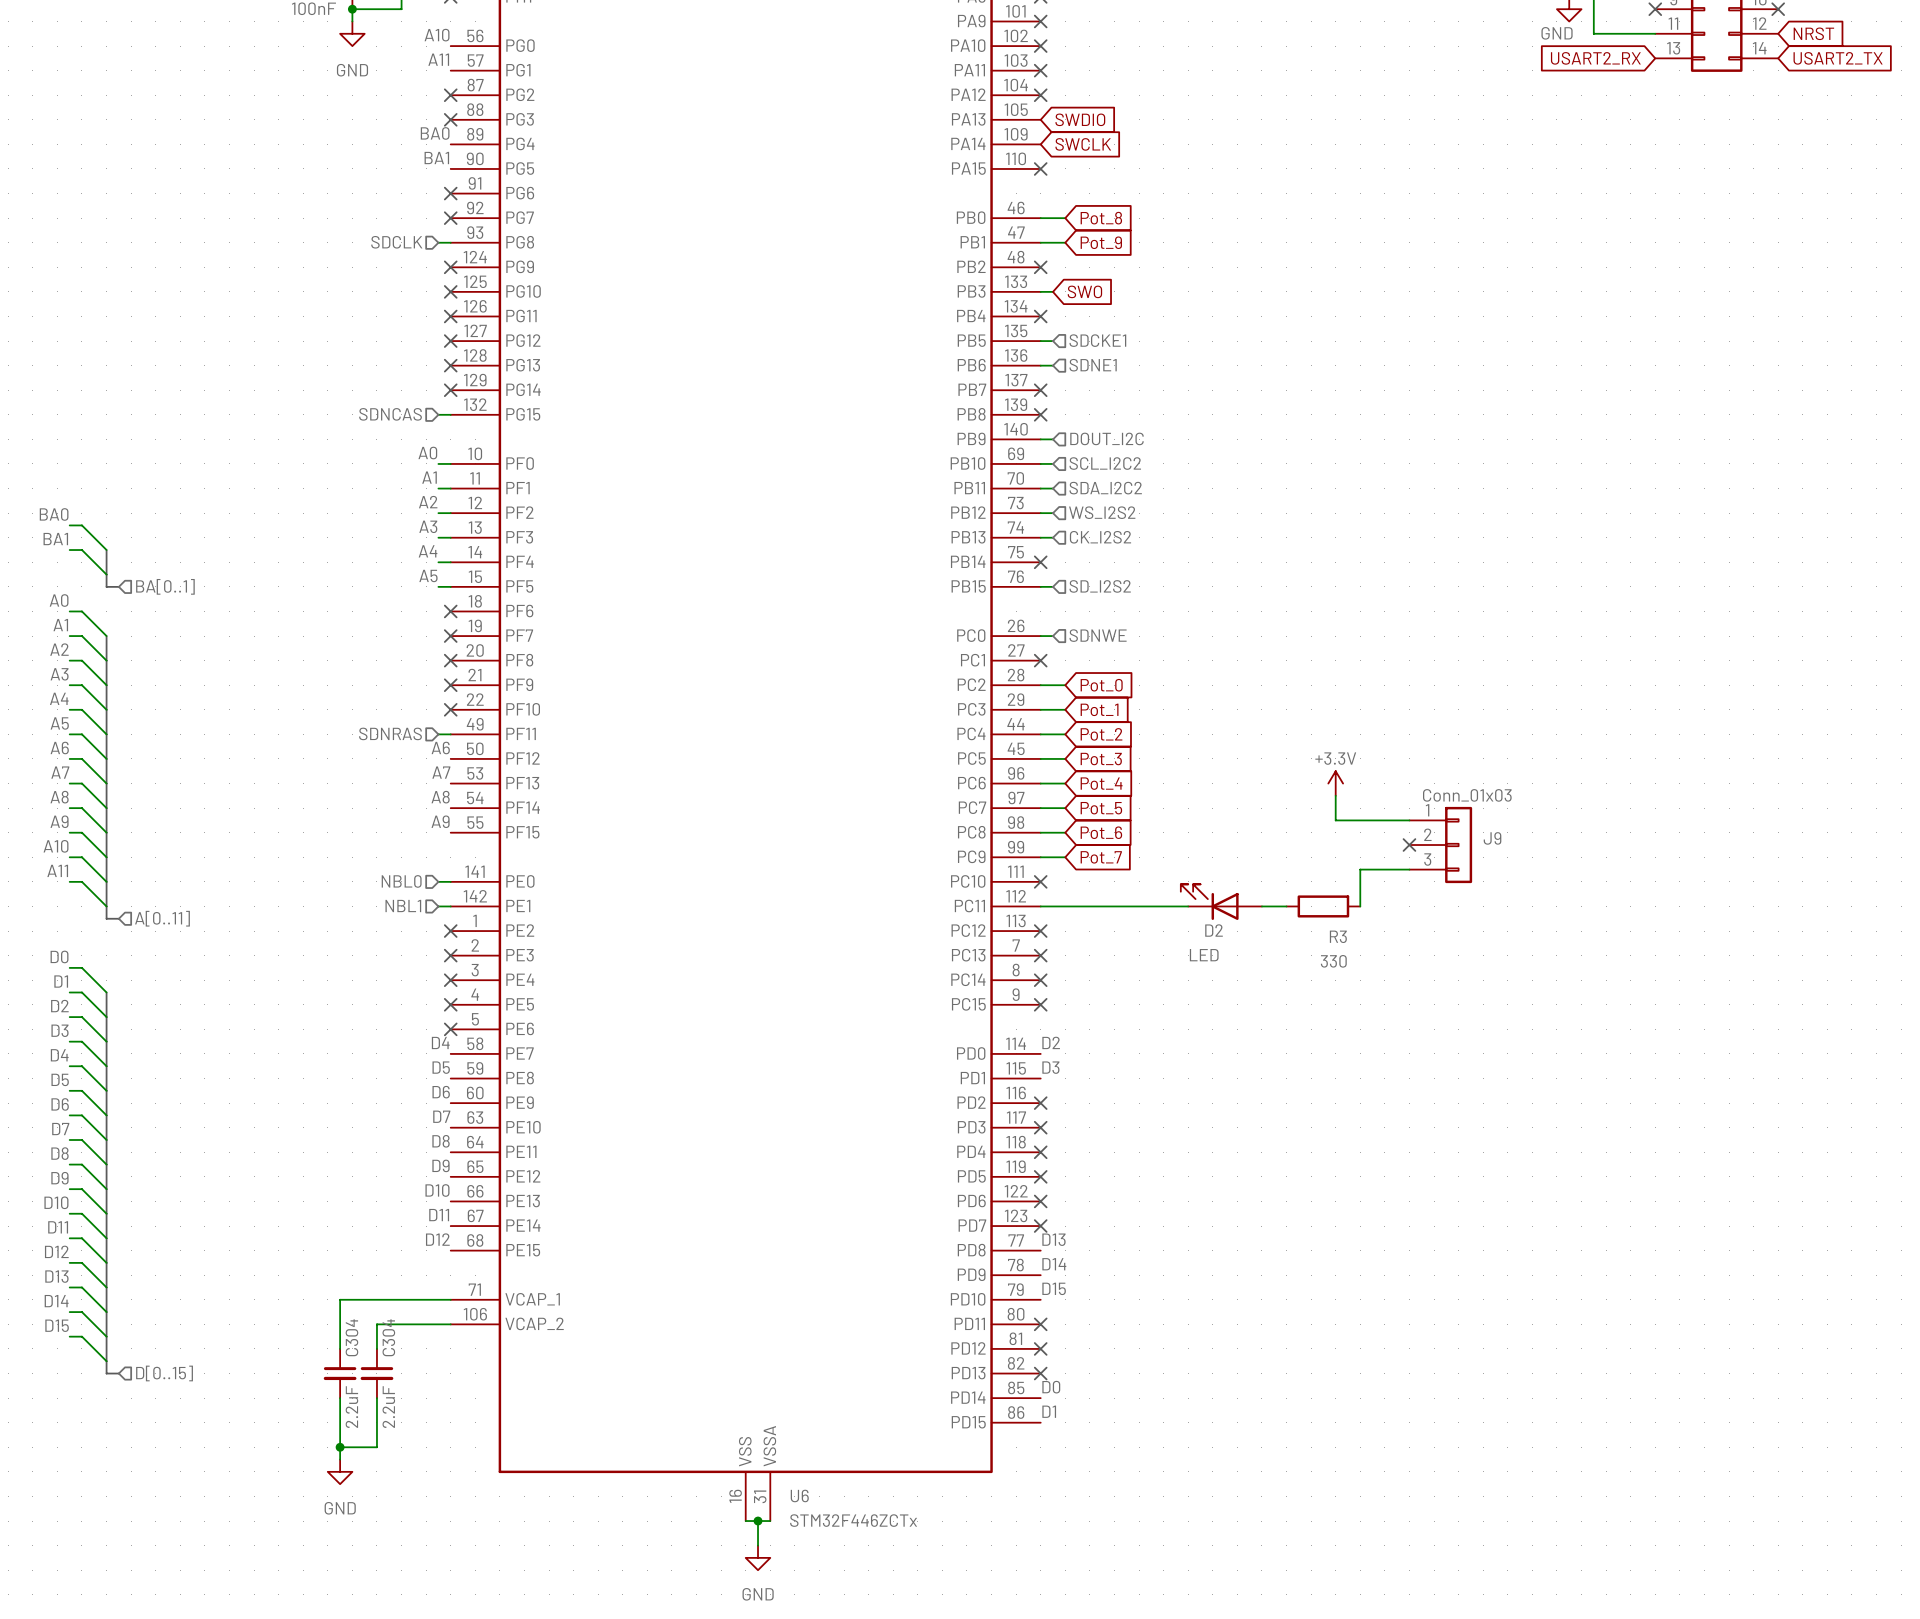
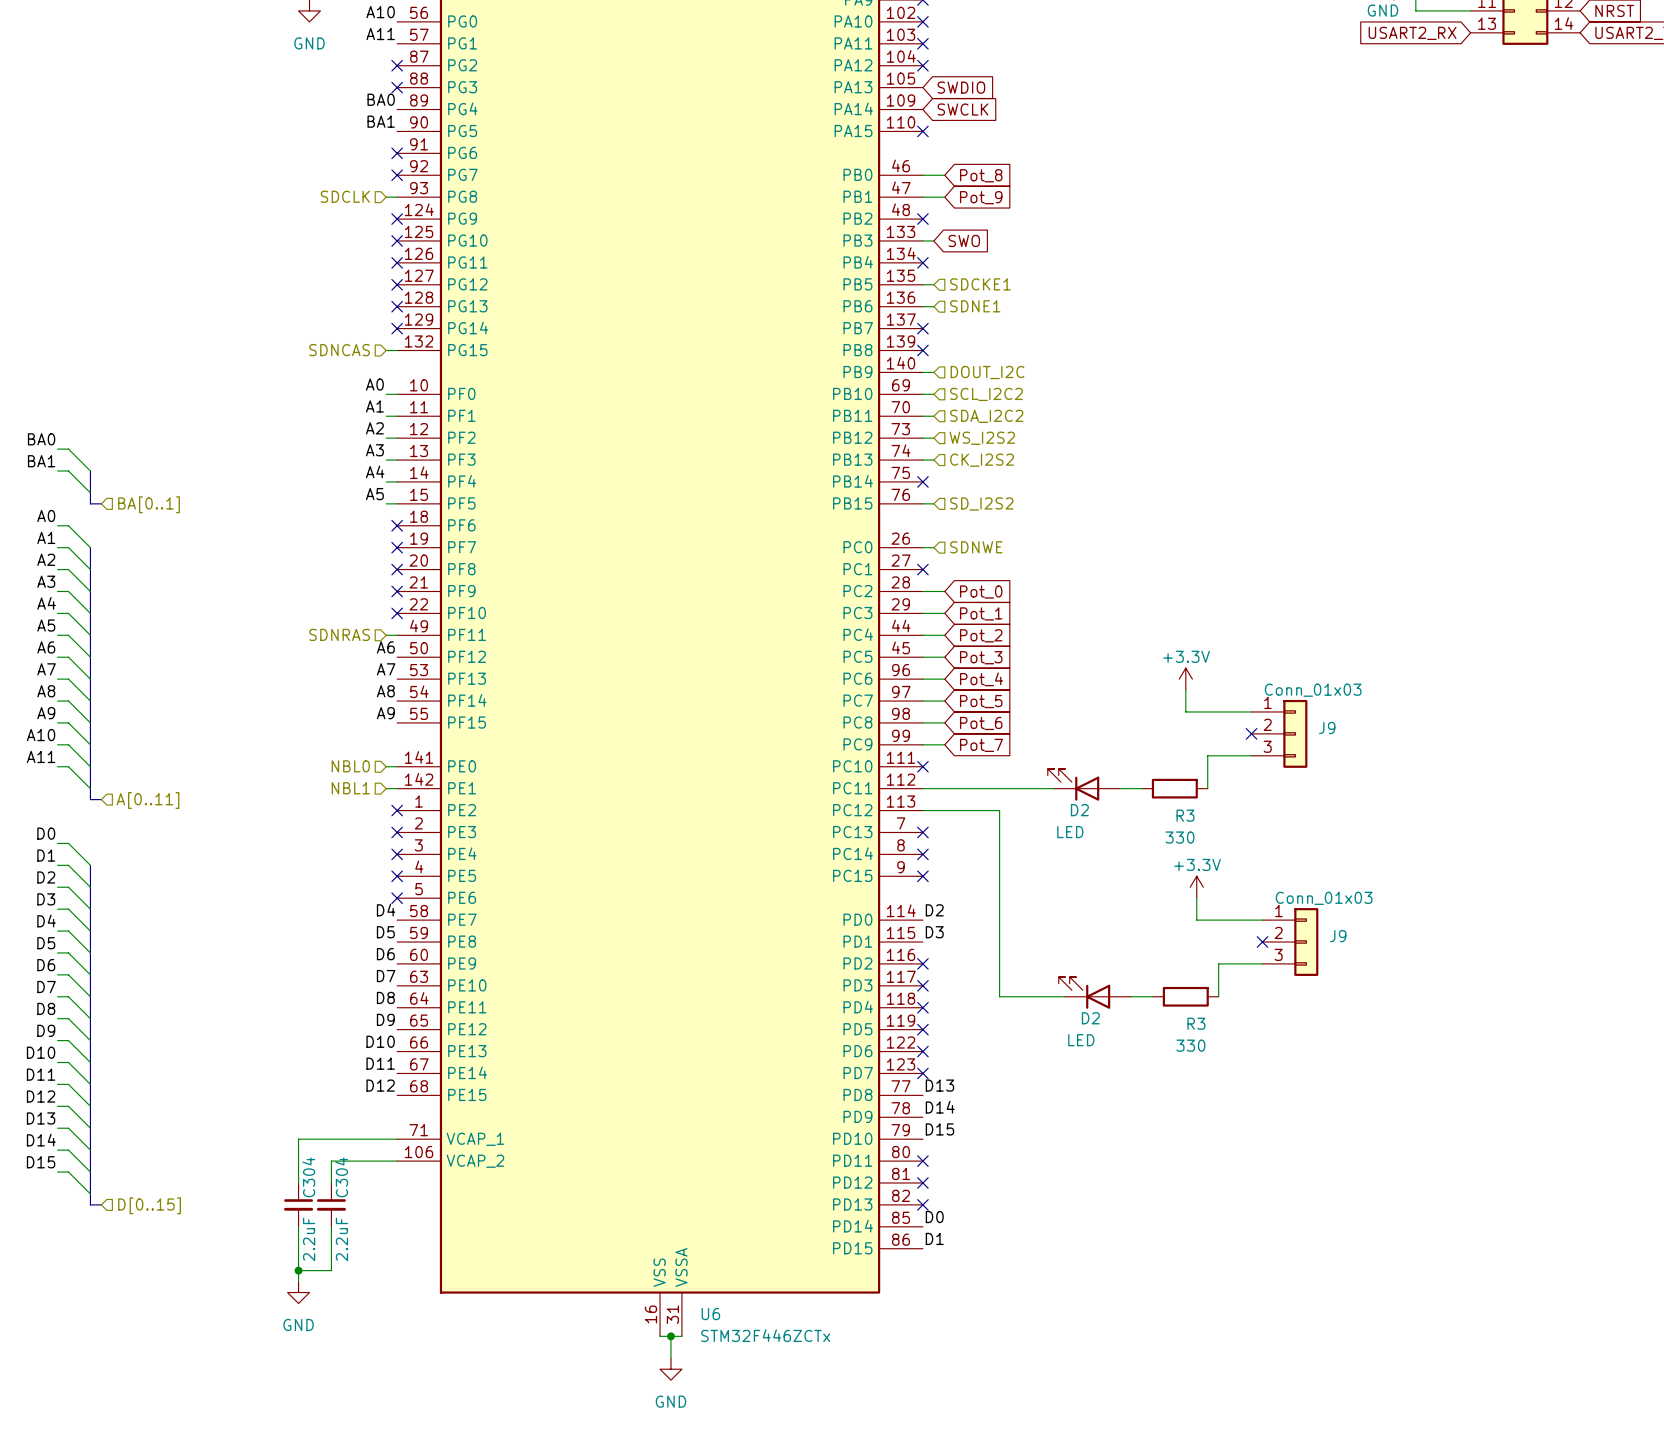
wire: none -> (922, 810) (999, 810) (999, 996) (1065, 996)
no-connect mark: (1040, 931) -> none
power symbol: none -> +3.3V (1196, 887)
wire: none -> (1196, 898) (1196, 920) (1262, 920)
no-connect mark: none -> (1262, 942)
J9: none -> Conn_01x03 (1290, 942)
wire: none -> (1262, 963) (1218, 963) (1218, 996)
D2: none -> LED (1094, 992)
wire: none -> (1131, 996) (1152, 996)
R3: none -> 330 (1185, 996)

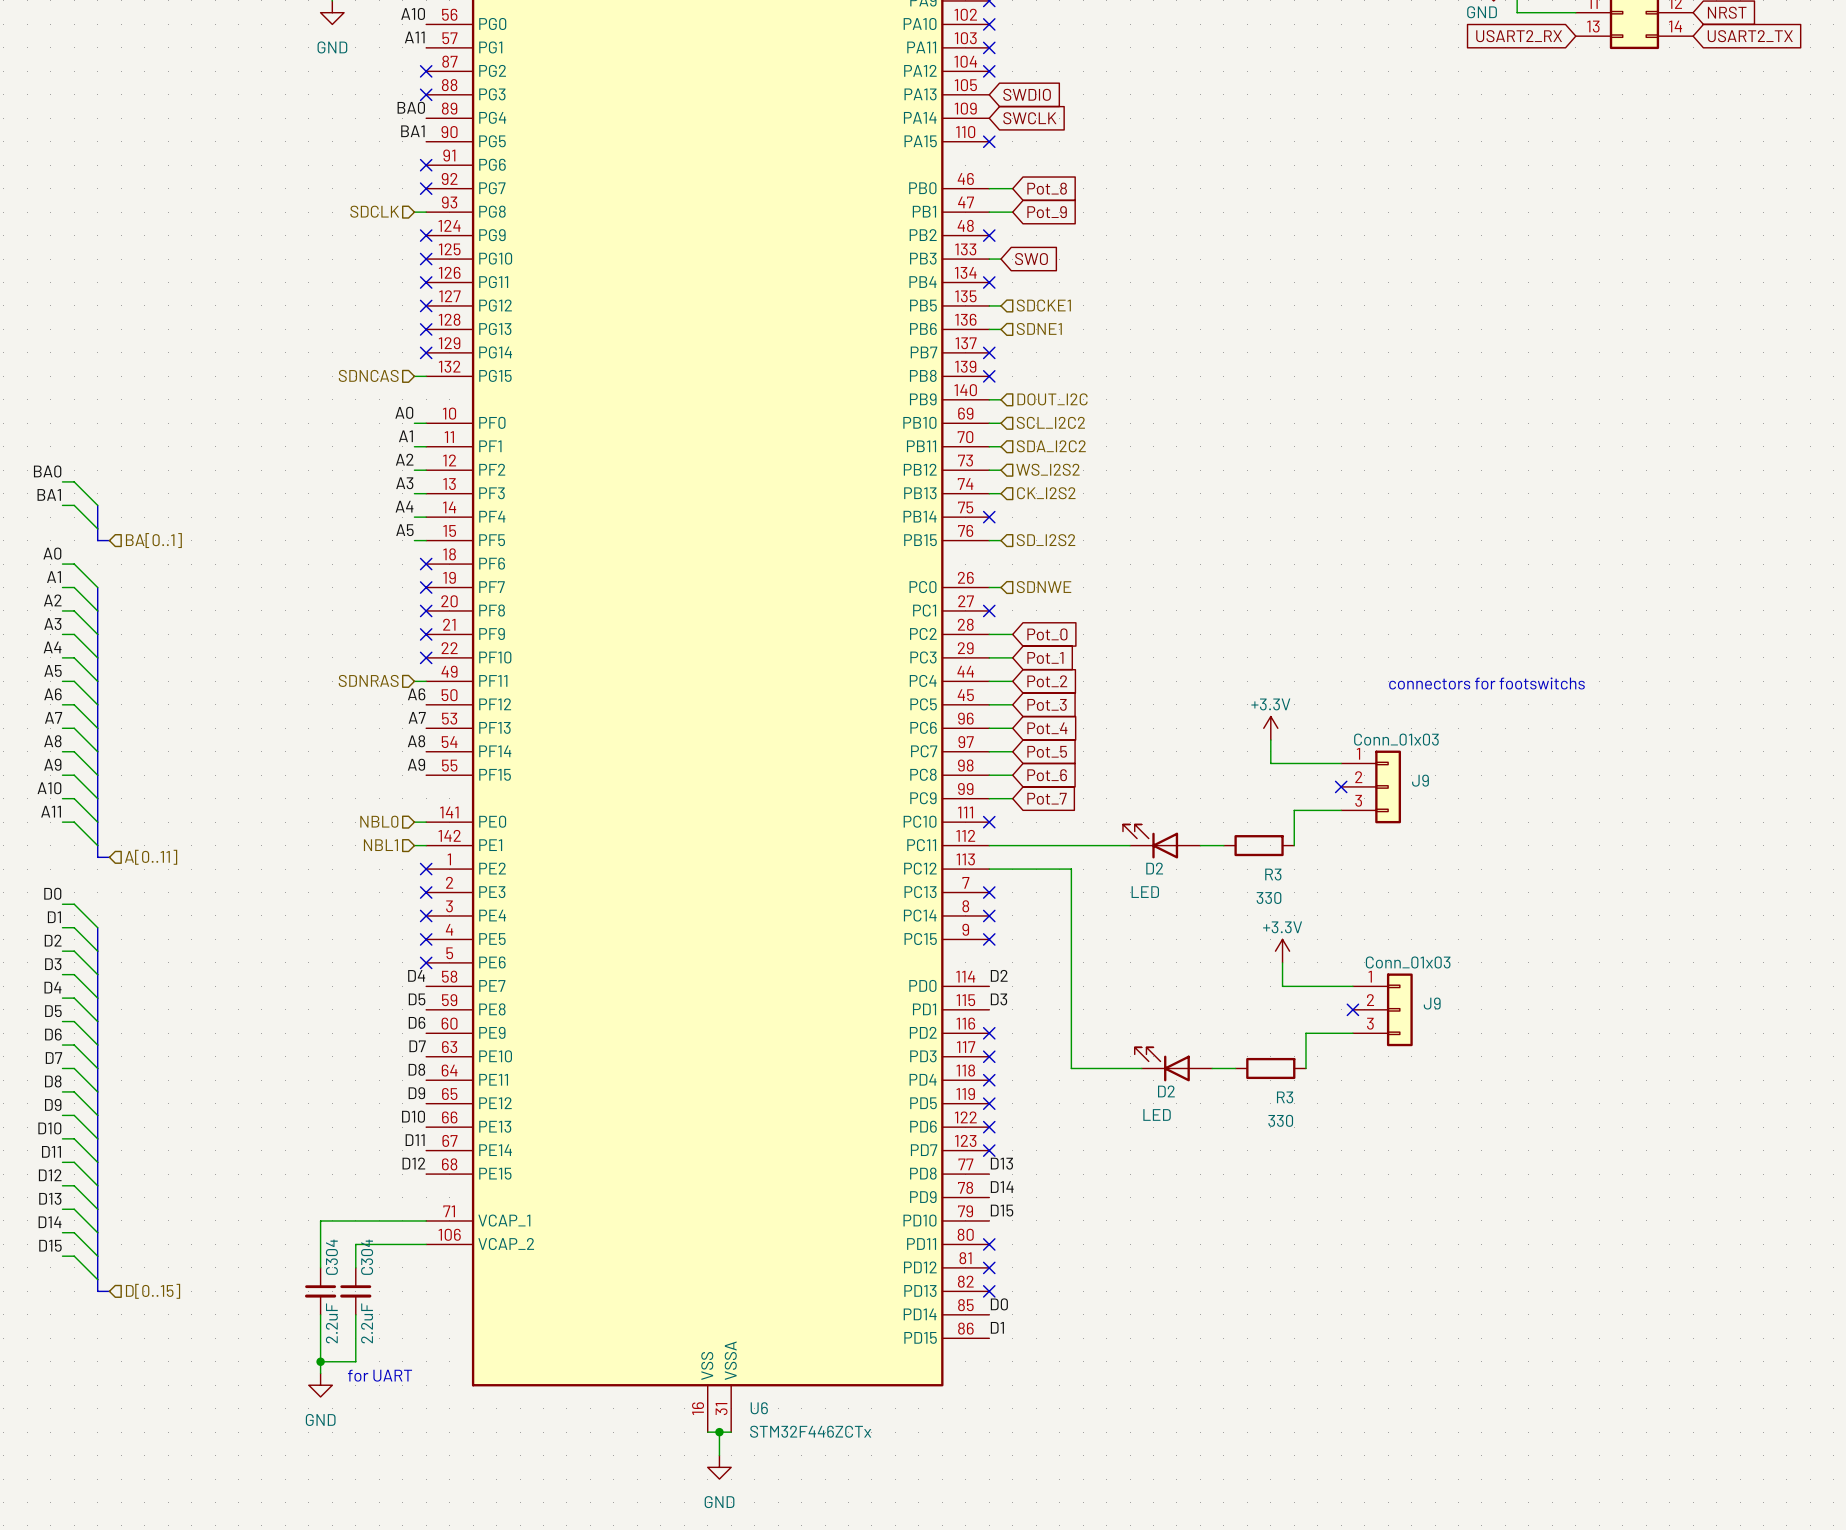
text: none -> connectors for footswitchs (1486, 683)
text: none -> for UART (380, 1375)

